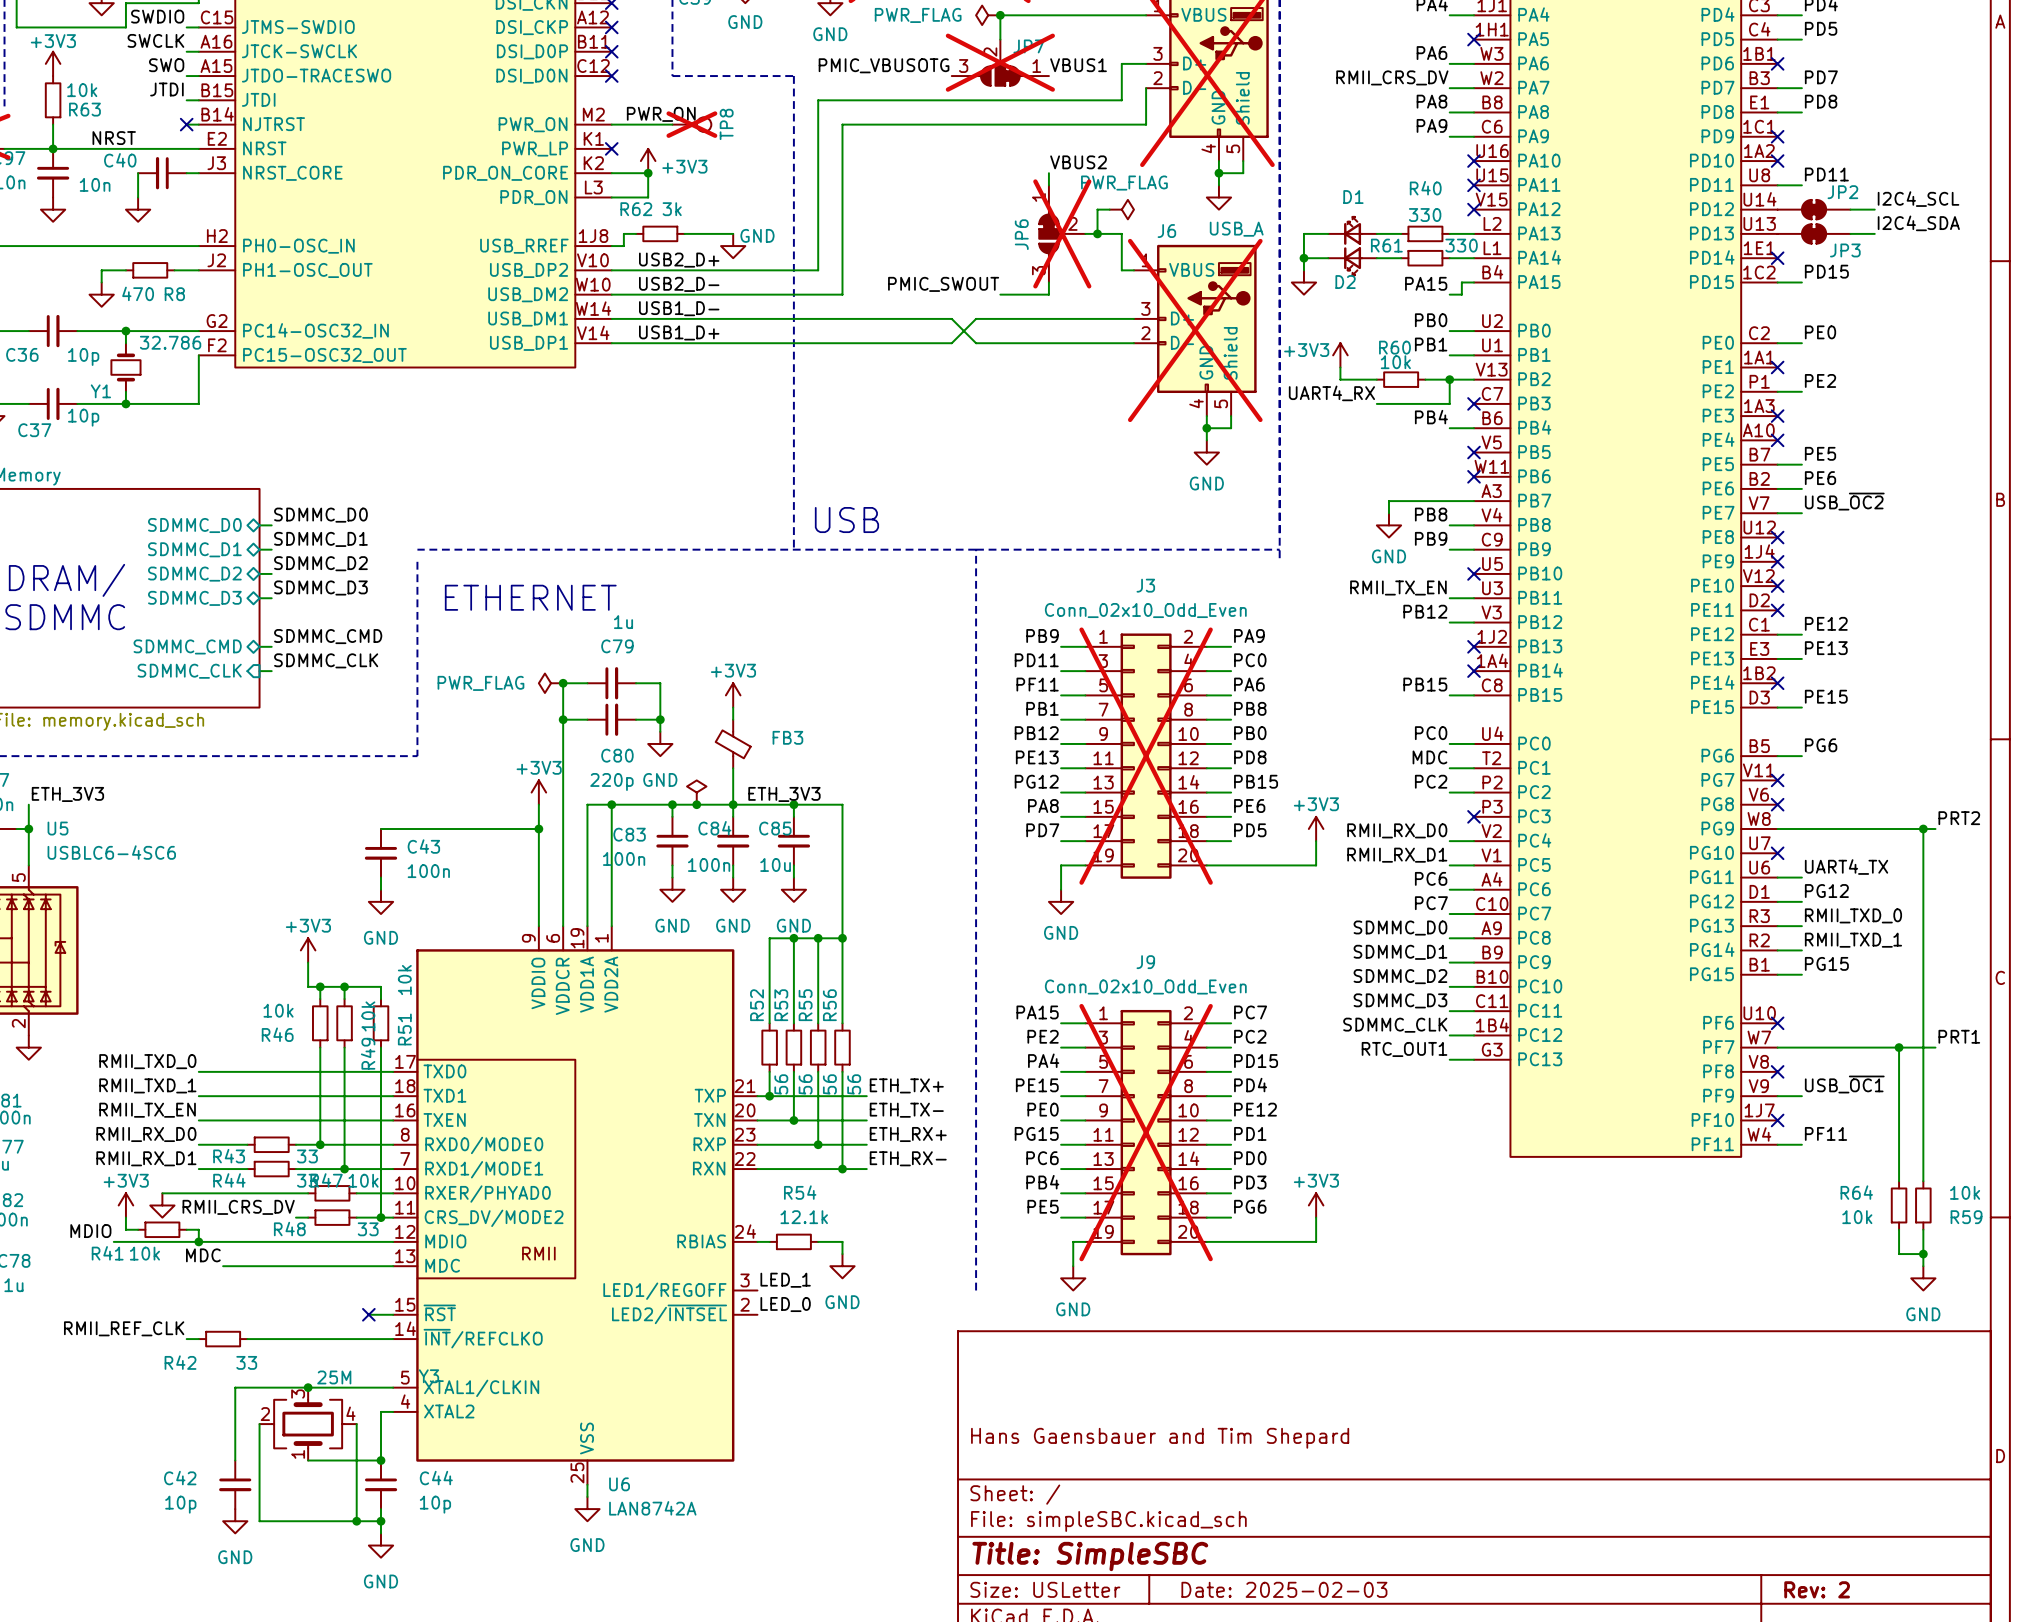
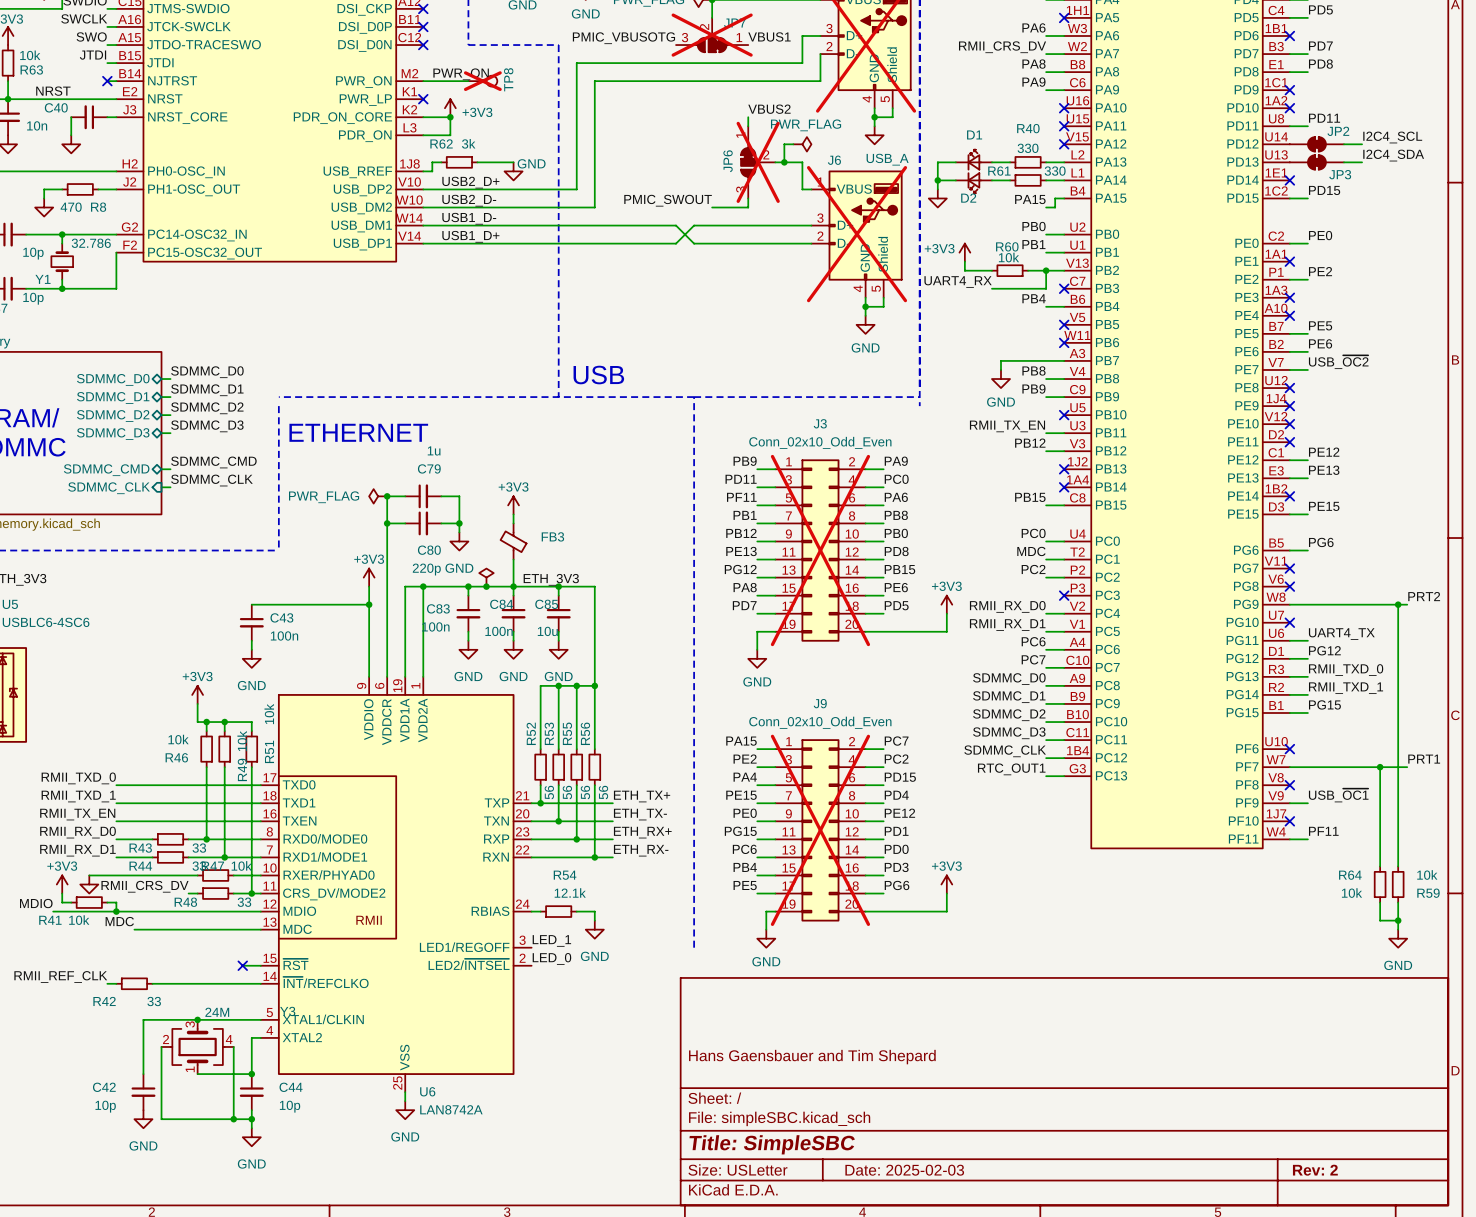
Y3 value: 25M (334, 1377) -> 24M (217, 1012)

